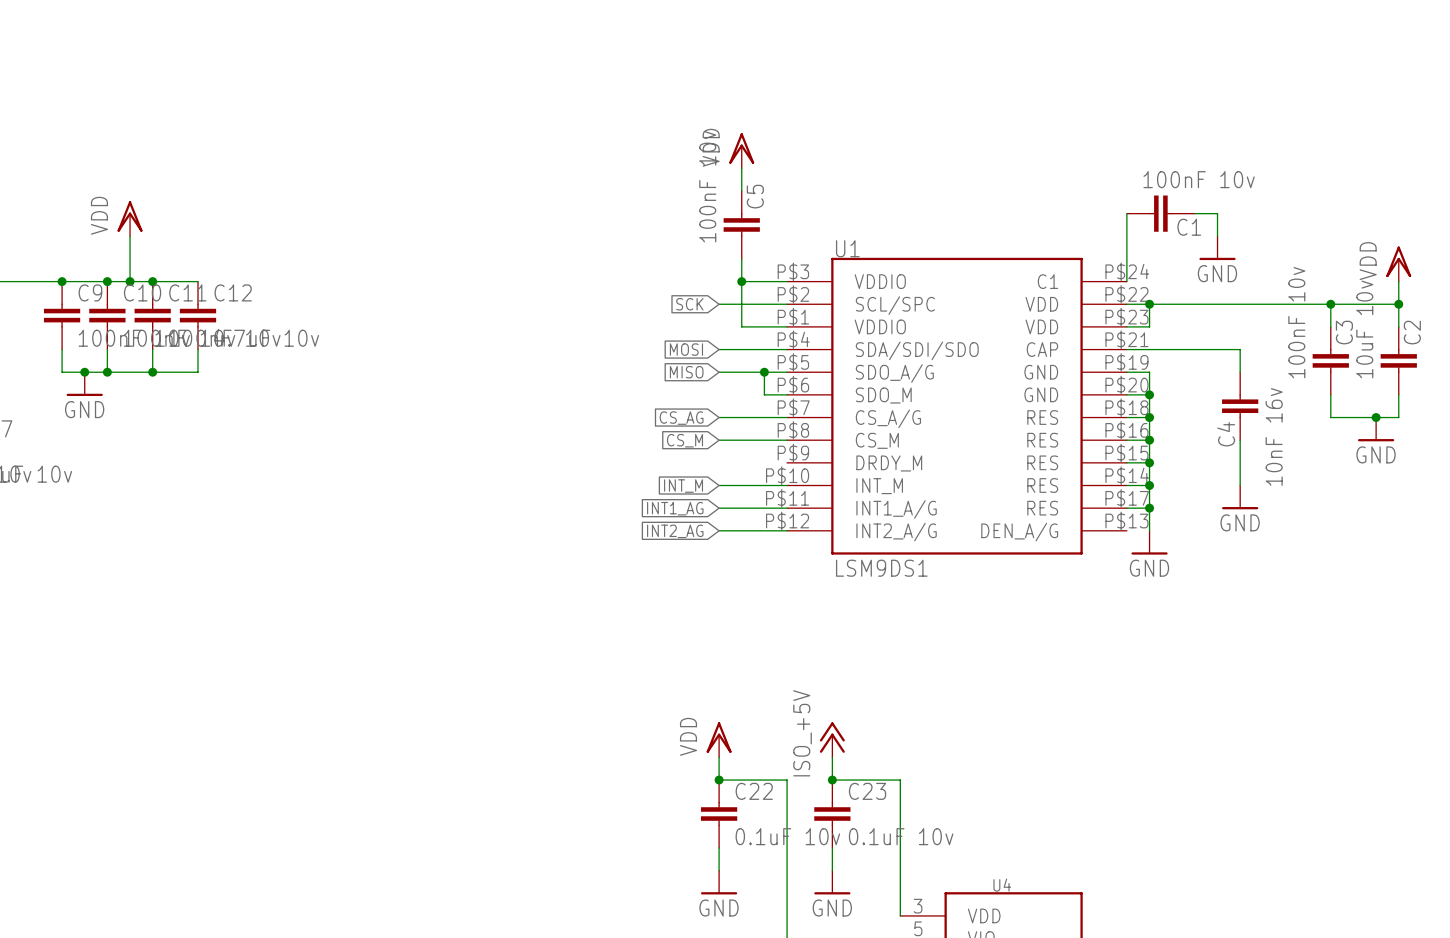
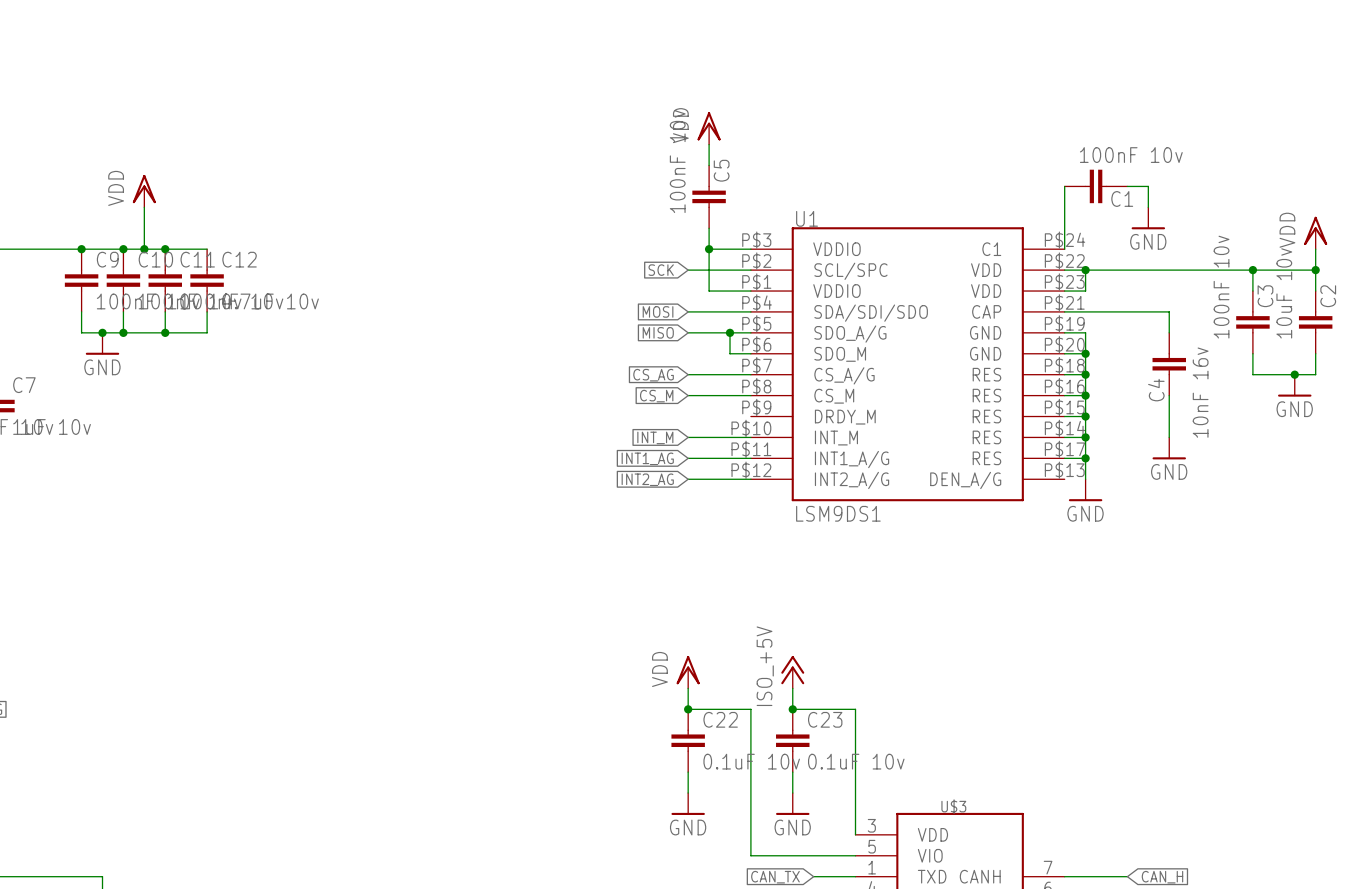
U4 name: U4 (1002, 885) -> U$3 (953, 806)

